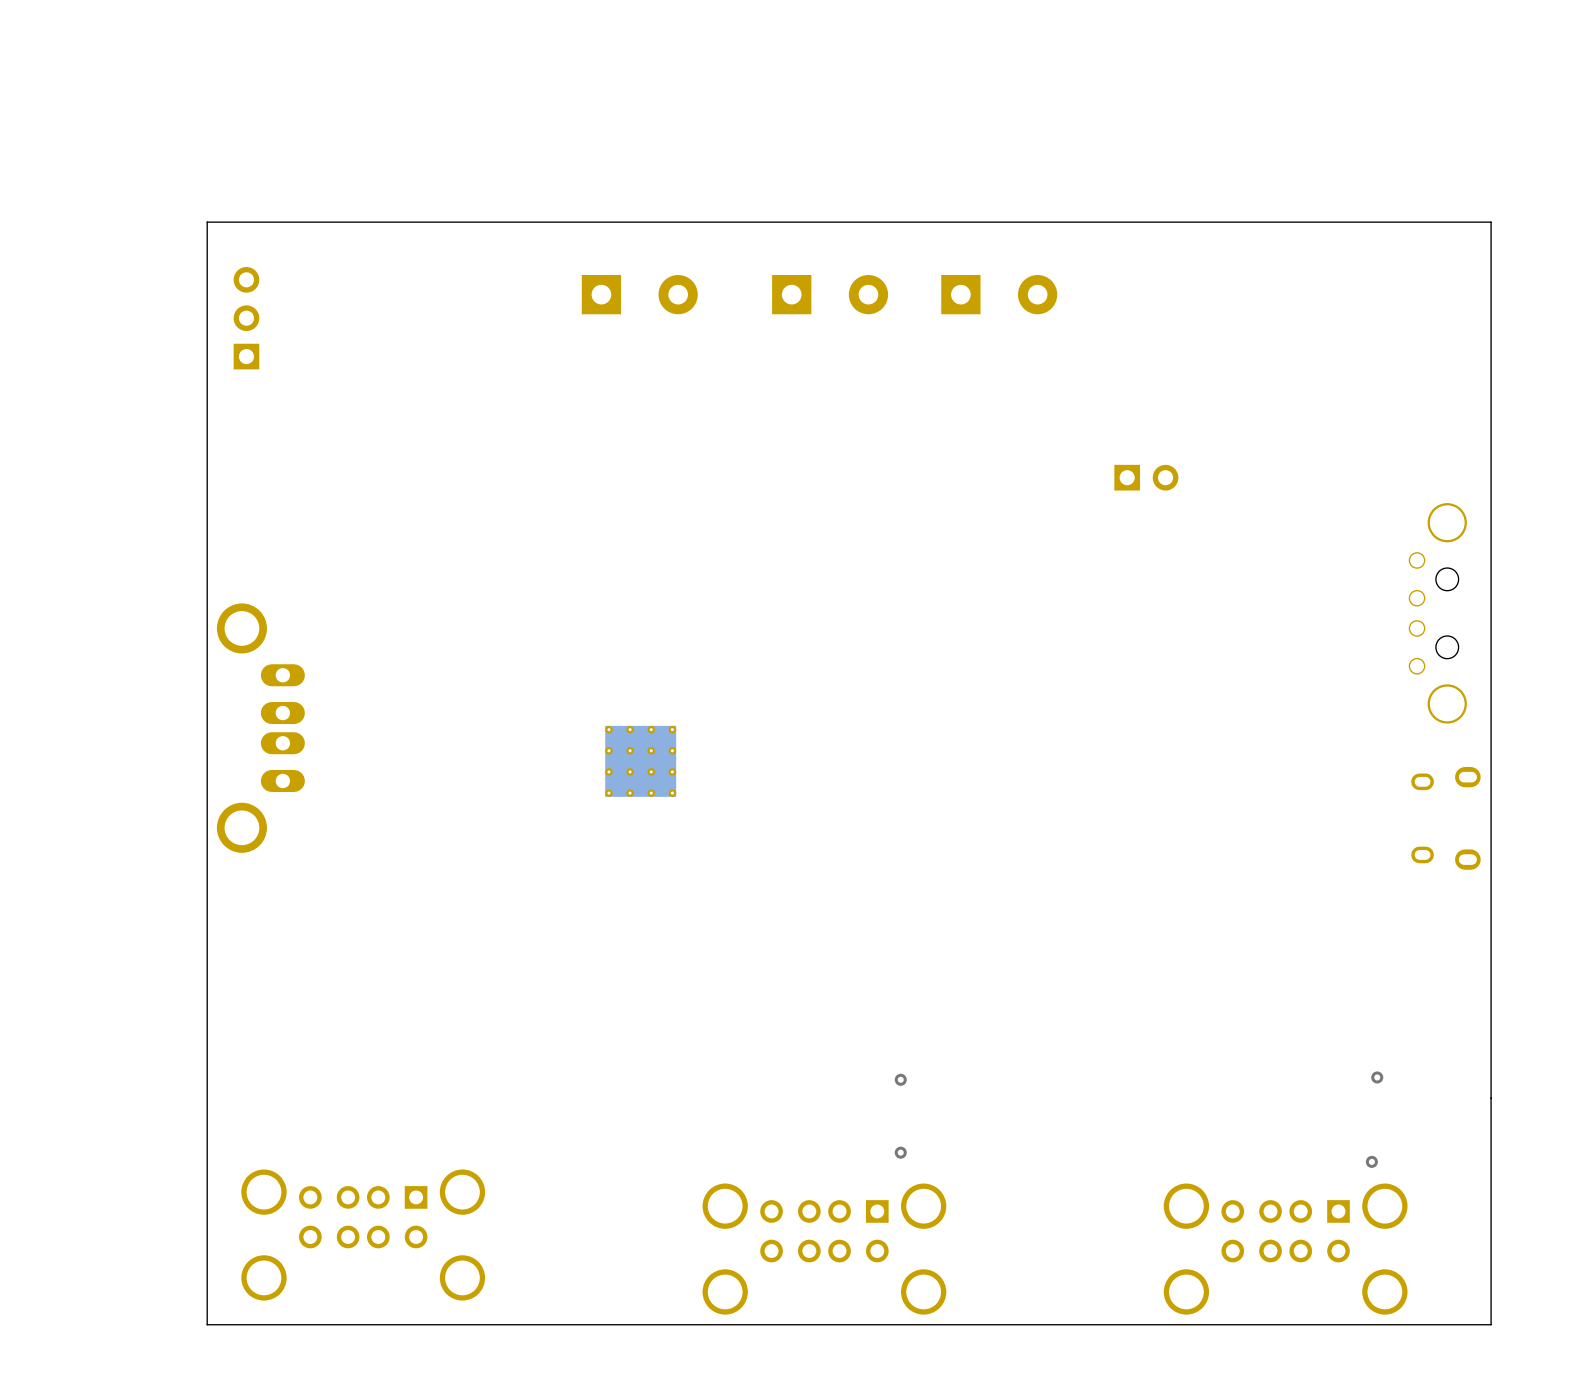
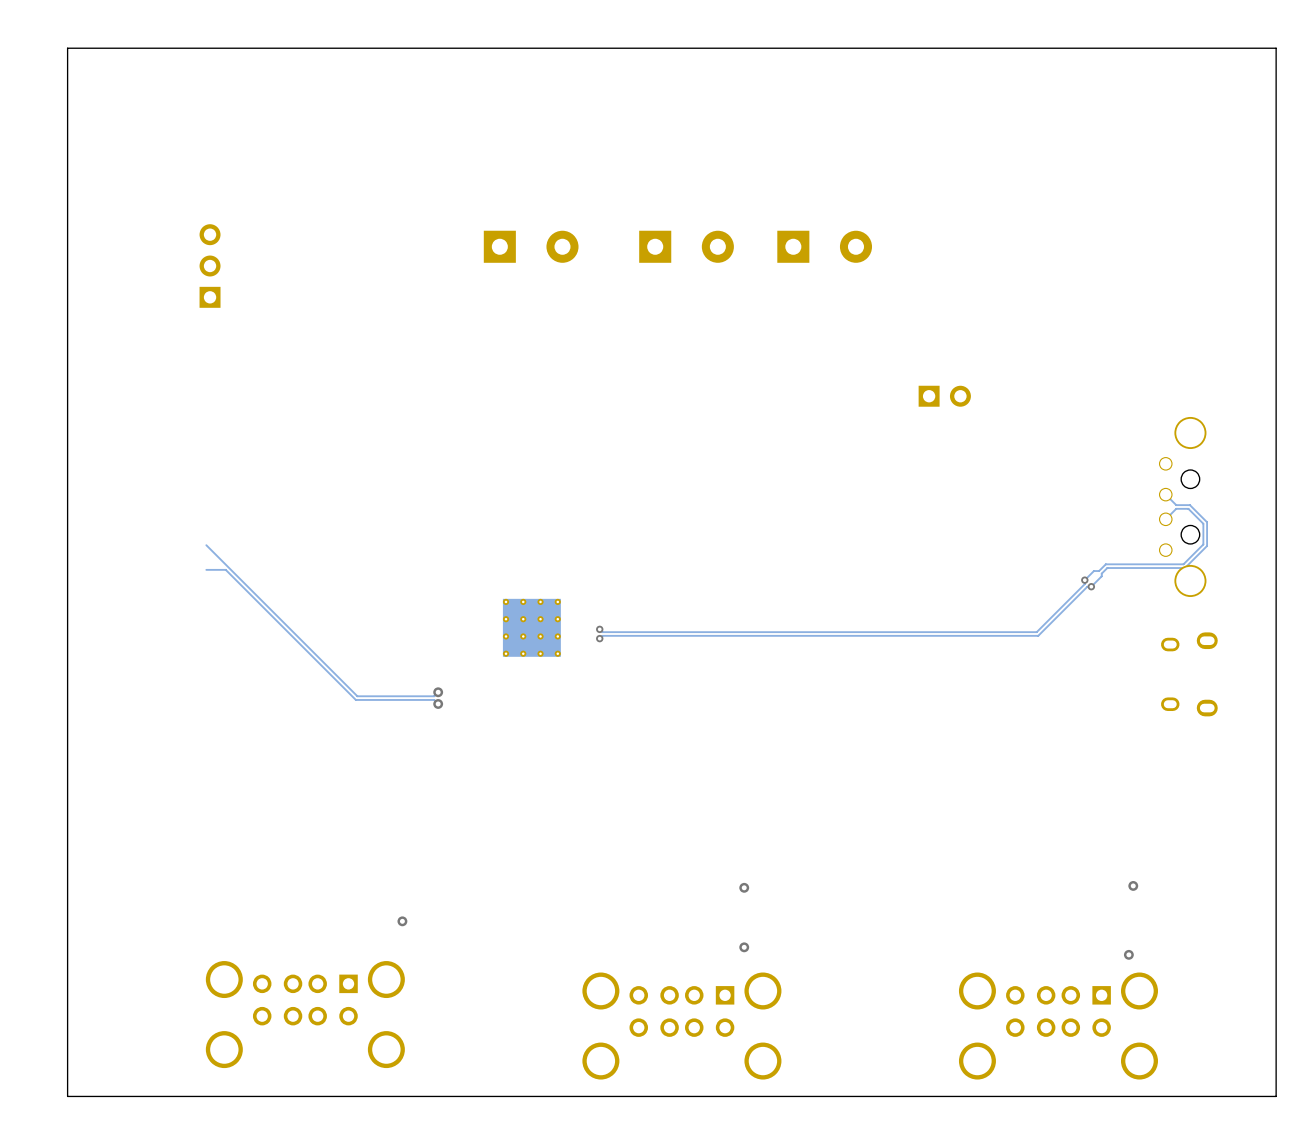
board edge: (1491, 222) (1491, 1324) (207, 1324) (207, 222) (1491, 222) -> (1276, 48) (1276, 1096) (67, 1096) (67, 48) (1276, 48)
track: none -> (1165, 494) (1176, 505) (1189, 505) (1207, 522) (1207, 545) (1185, 568) (1107, 568) (1091, 586) (1087, 586) (1038, 635) (602, 635) (599, 638)
track: none -> (1165, 519) (1176, 508) (1188, 508) (1203, 523) (1203, 544) (1183, 564) (1105, 564) (1099, 571) (1093, 571) (1084, 580) (1084, 584) (1036, 632) (602, 632) (599, 629)
track: none -> (206, 545) (357, 696) (434, 696) (438, 692)
track: none -> (206, 569) (225, 569) (355, 699) (434, 699) (438, 703)
via: none -> (1084, 580)
via: none -> (1091, 586)
part: (260, 728) -> none
via: none -> (599, 629)
via: none -> (599, 638)
via: none -> (438, 692)
via: none -> (438, 703)
via: none -> (402, 921)

